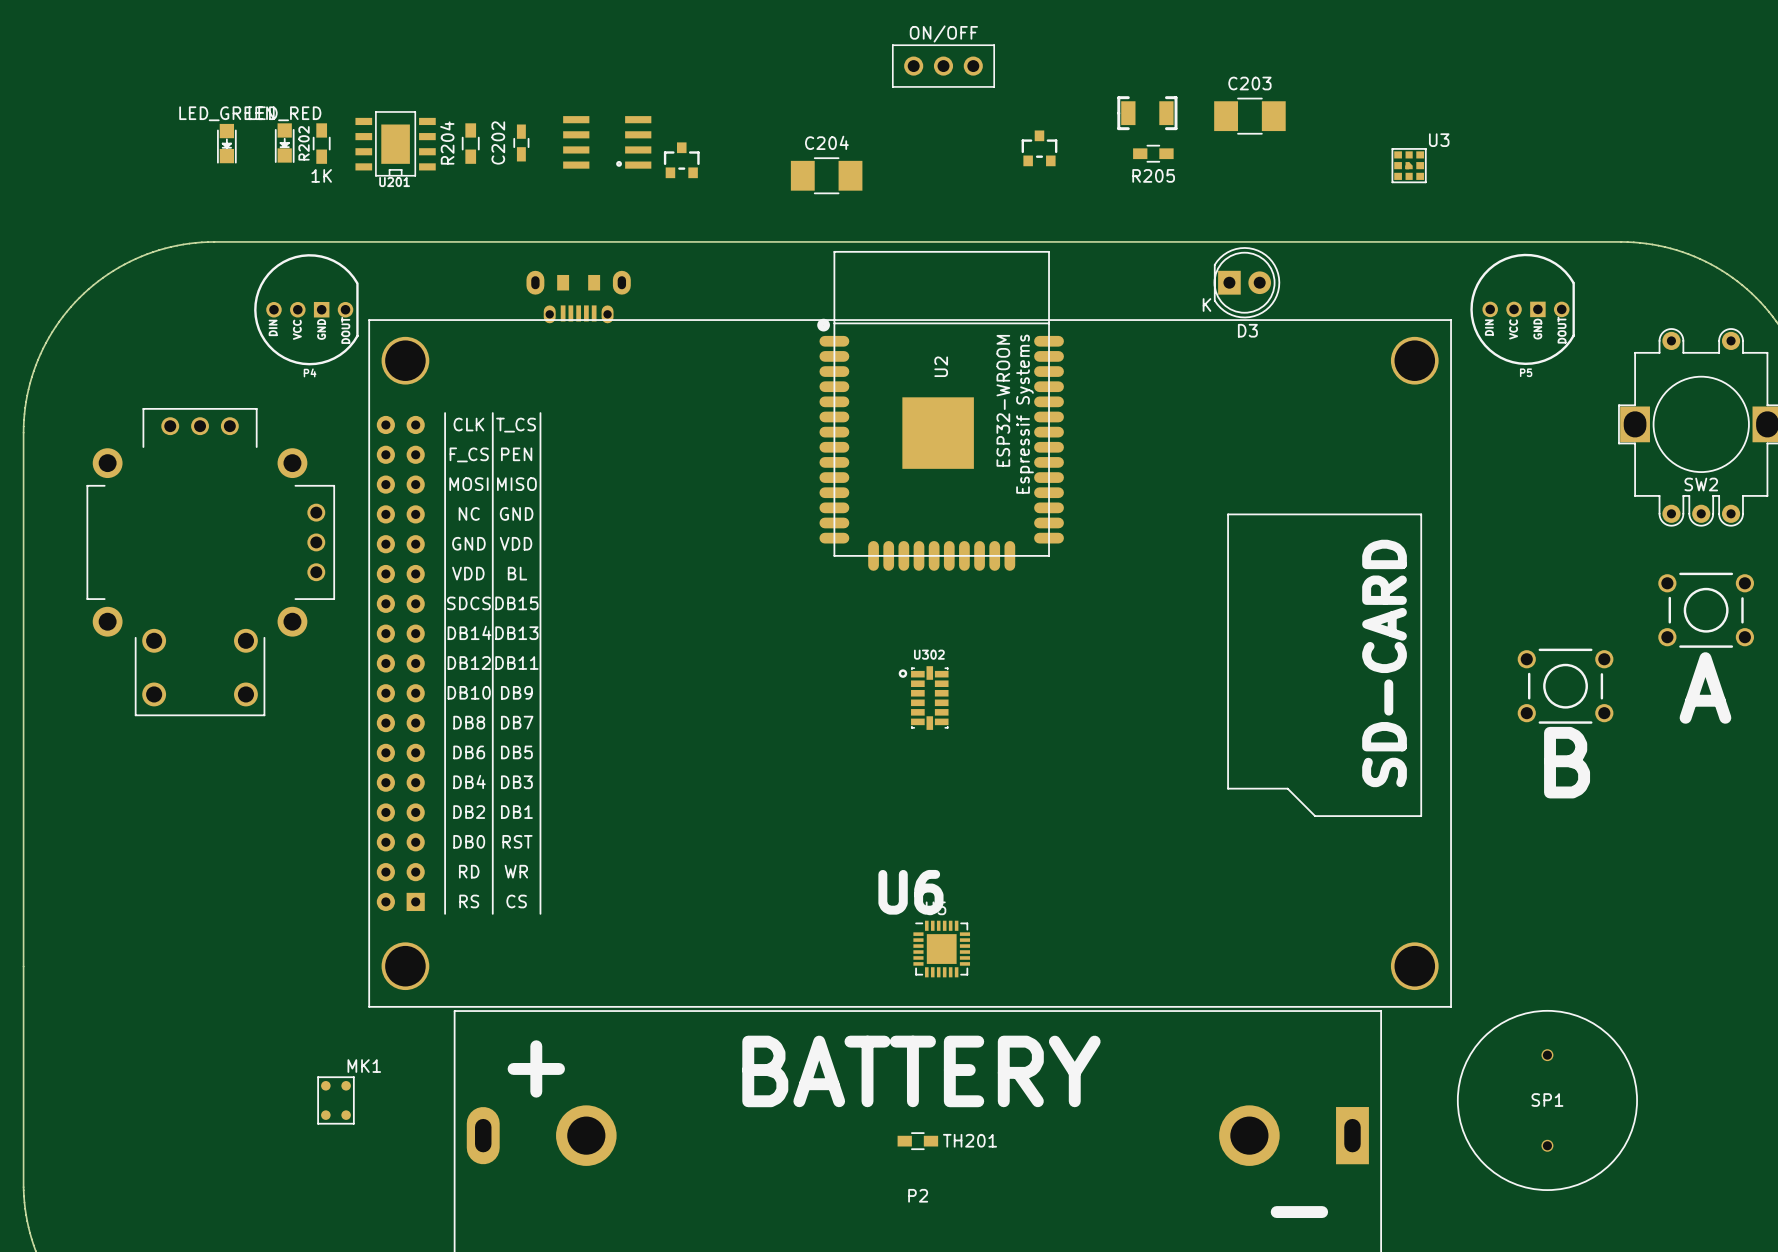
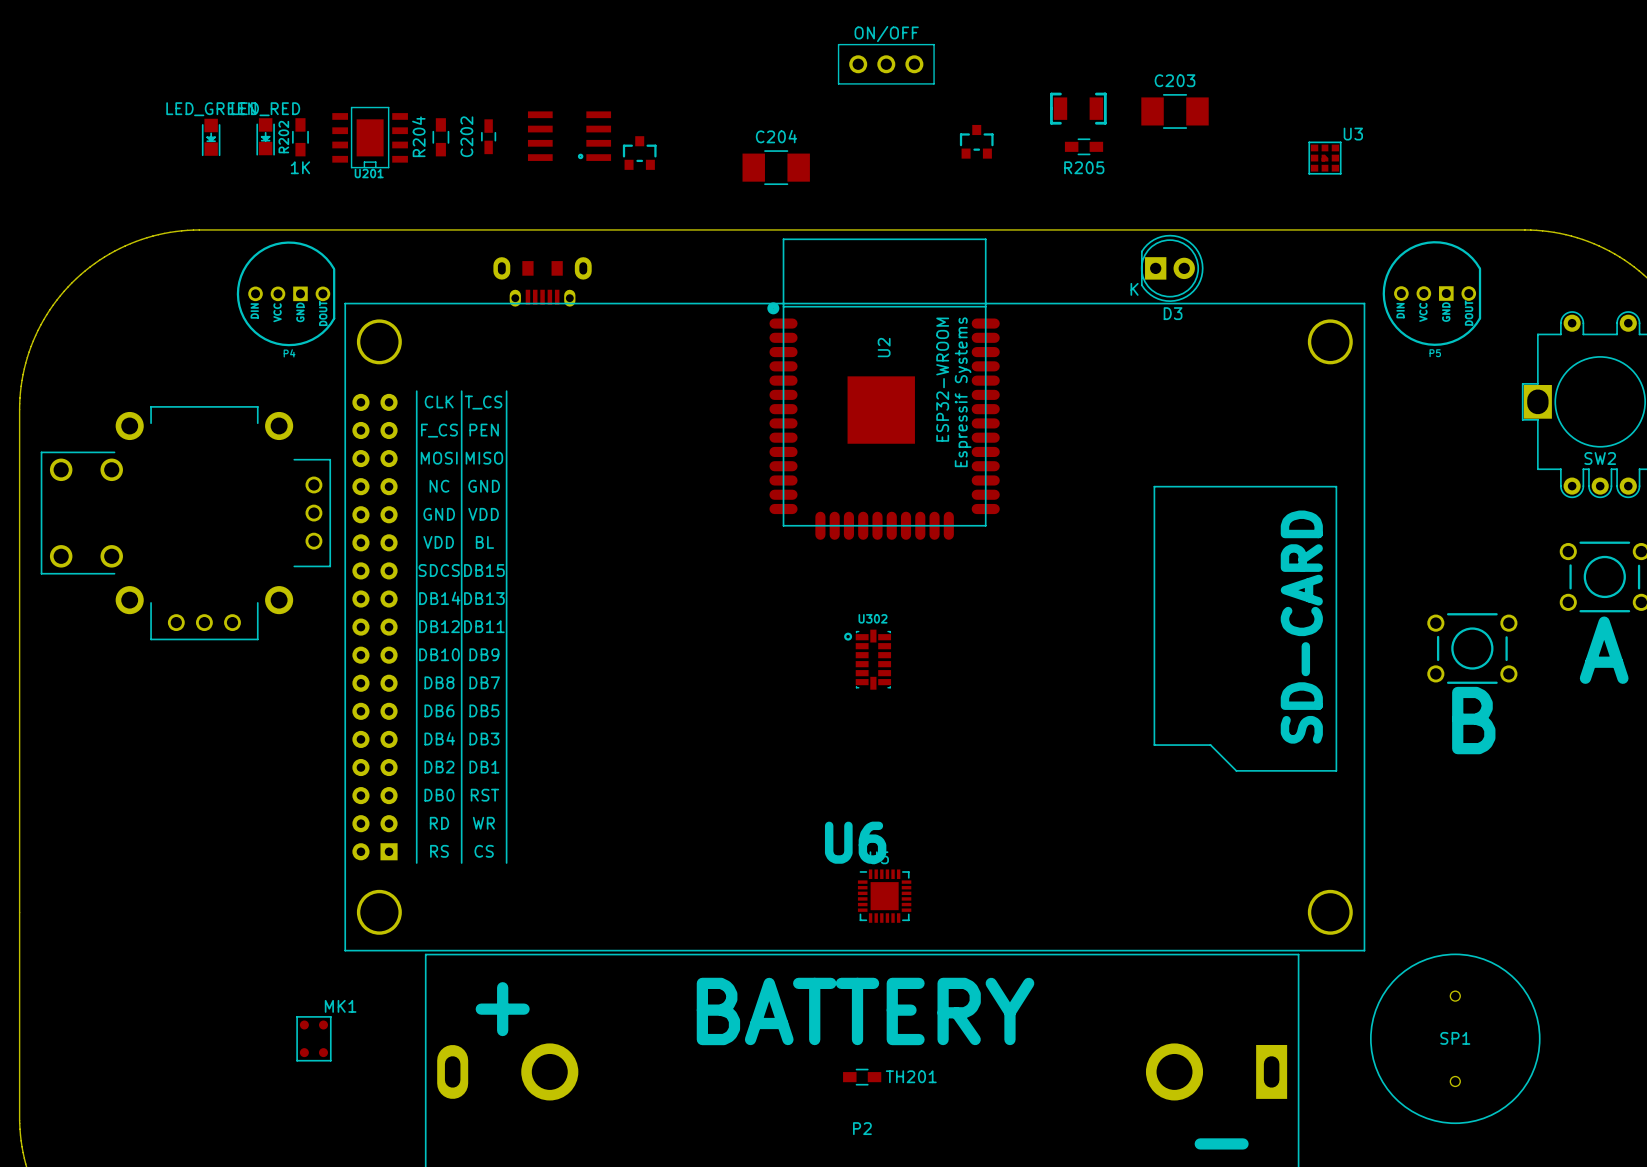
part rotation: 0° (210, 562) -> 90° clockwise (185, 523)

